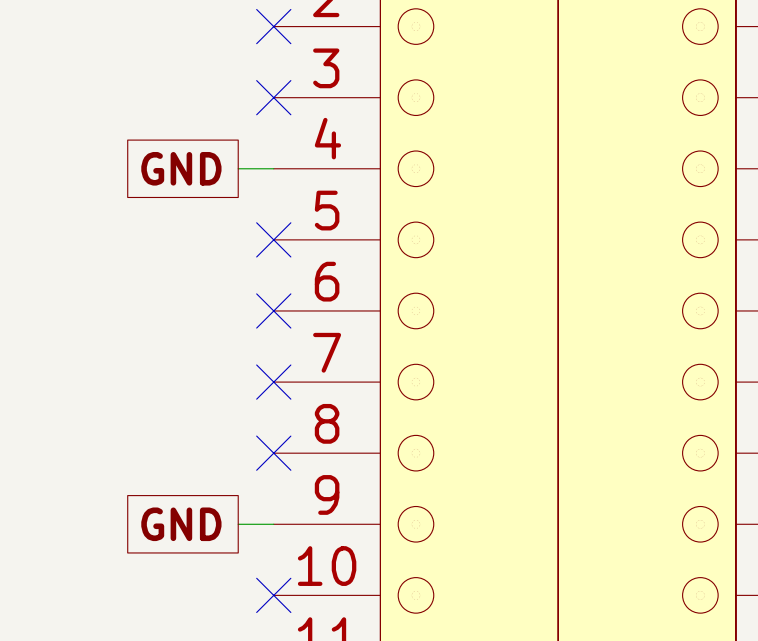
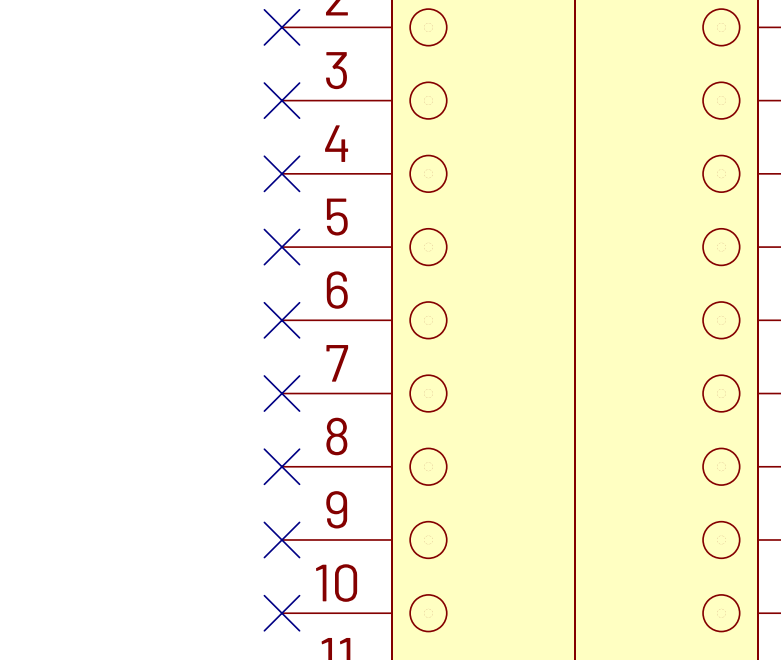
global label: GND (181, 168) -> none
wire: (238, 168) (273, 168) -> none
no-connect mark: none -> (281, 173)
global label: GND (181, 524) -> none
wire: (238, 524) (273, 524) -> none
no-connect mark: none -> (281, 539)

